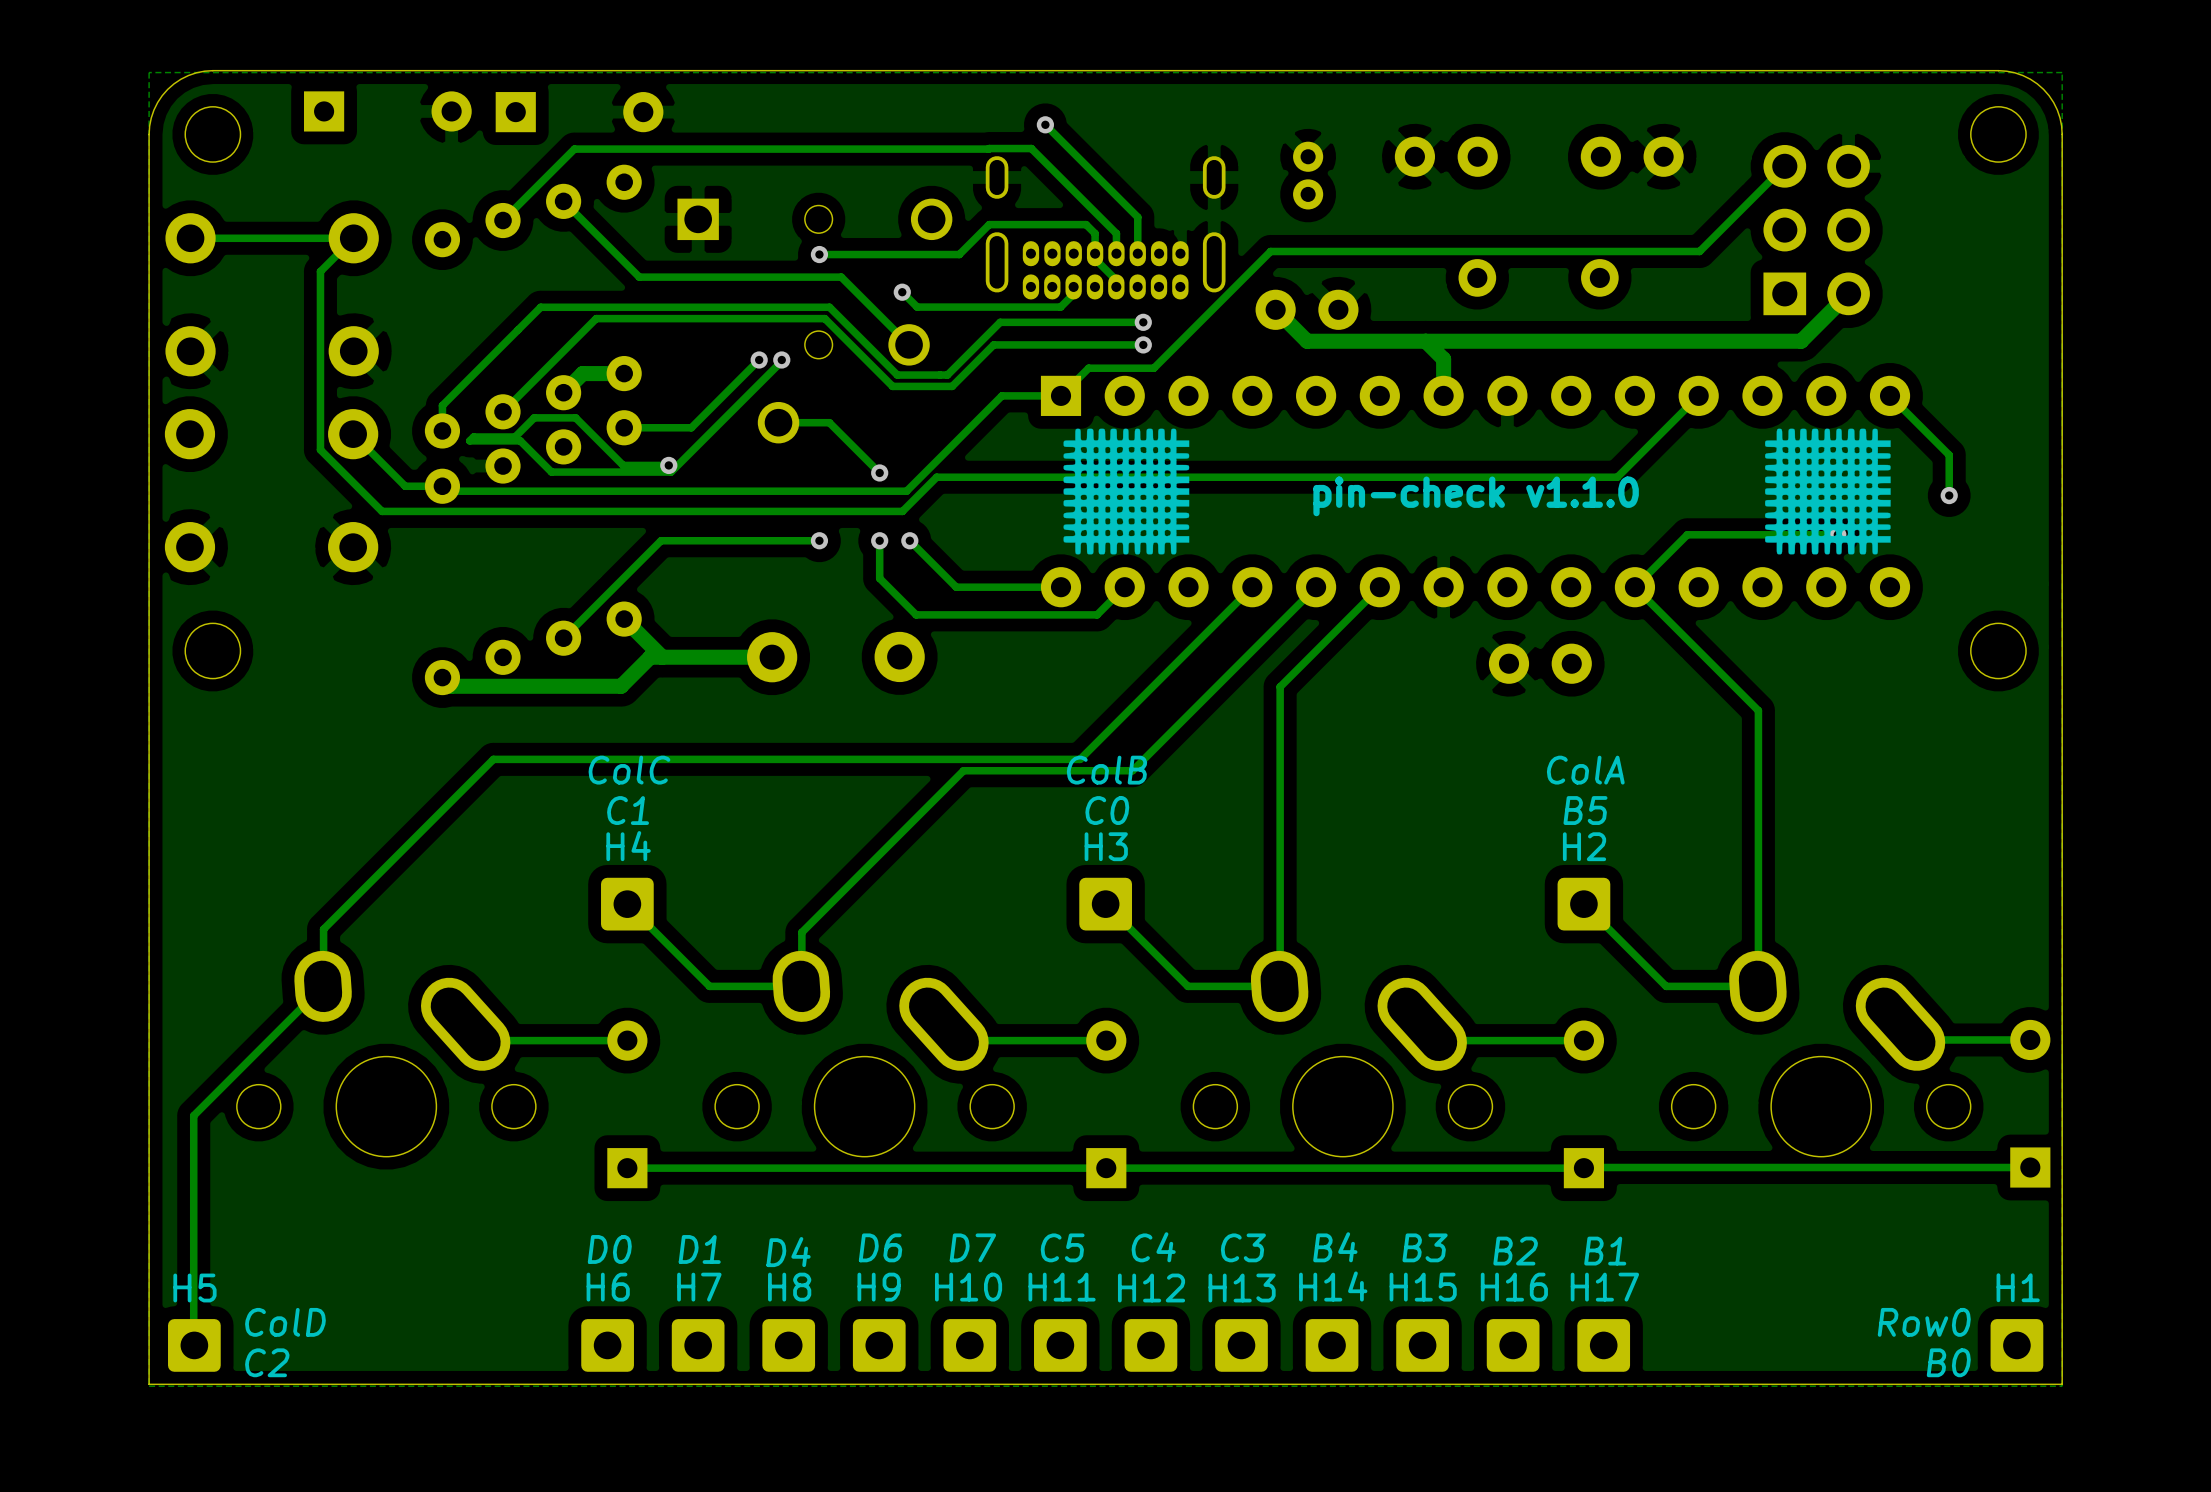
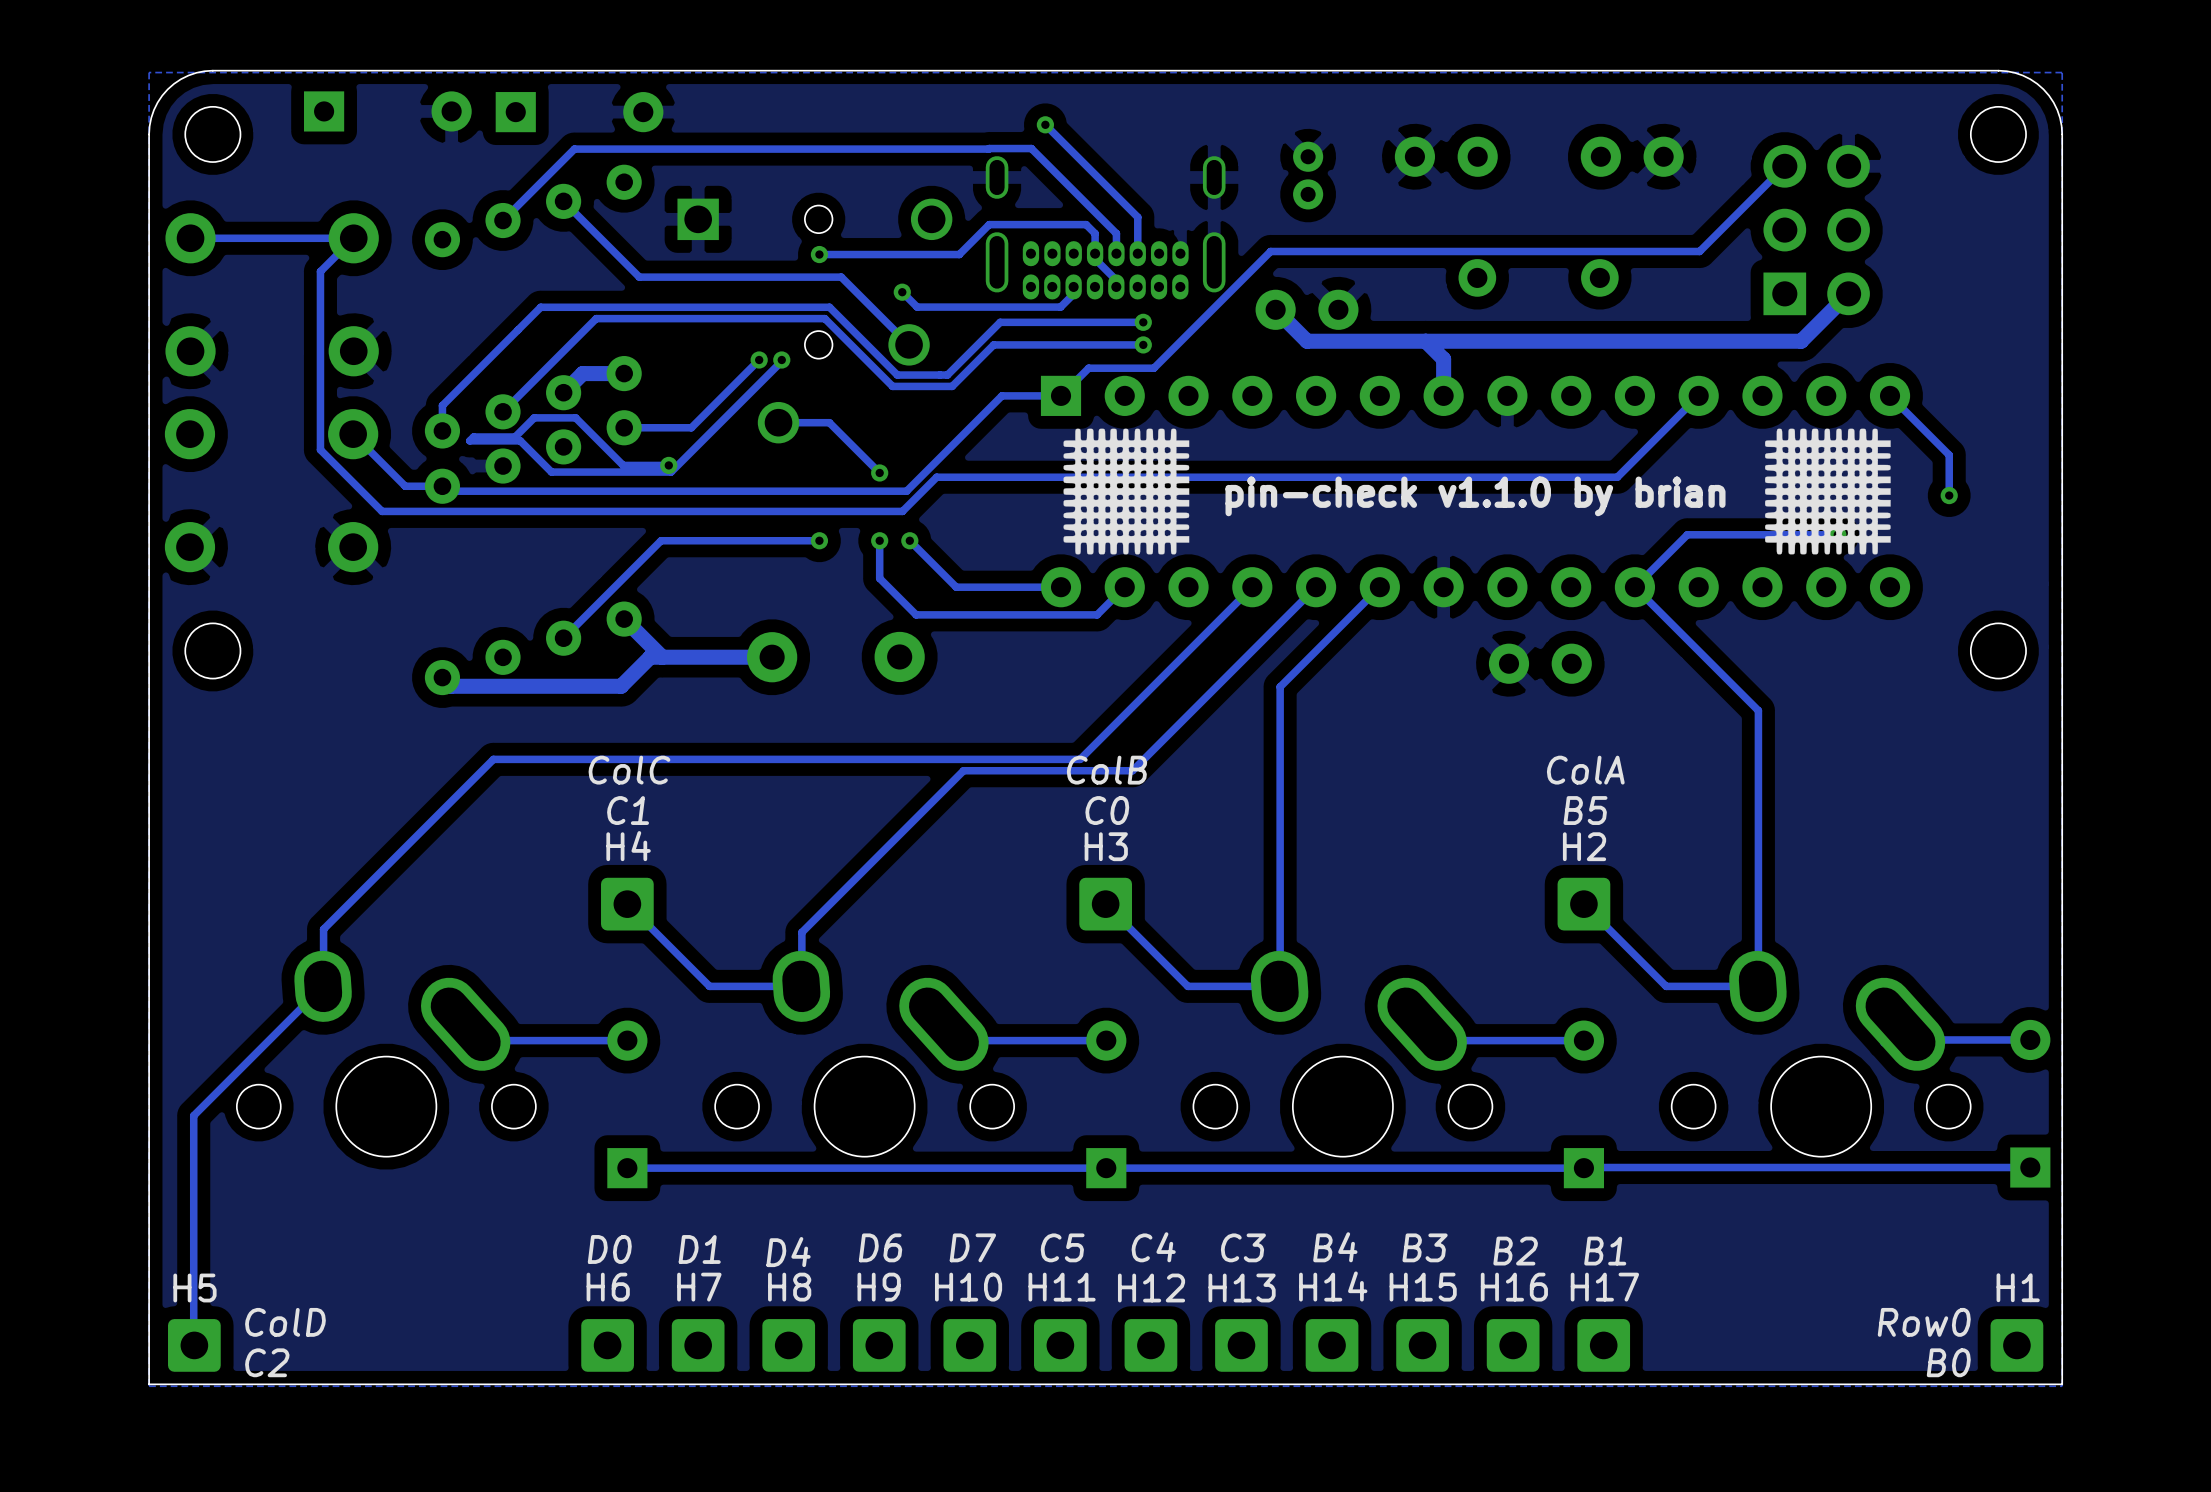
text: pin-check v1.1.0 (1476, 496) -> pin-check v1.1.0 by brian (1475, 496)

